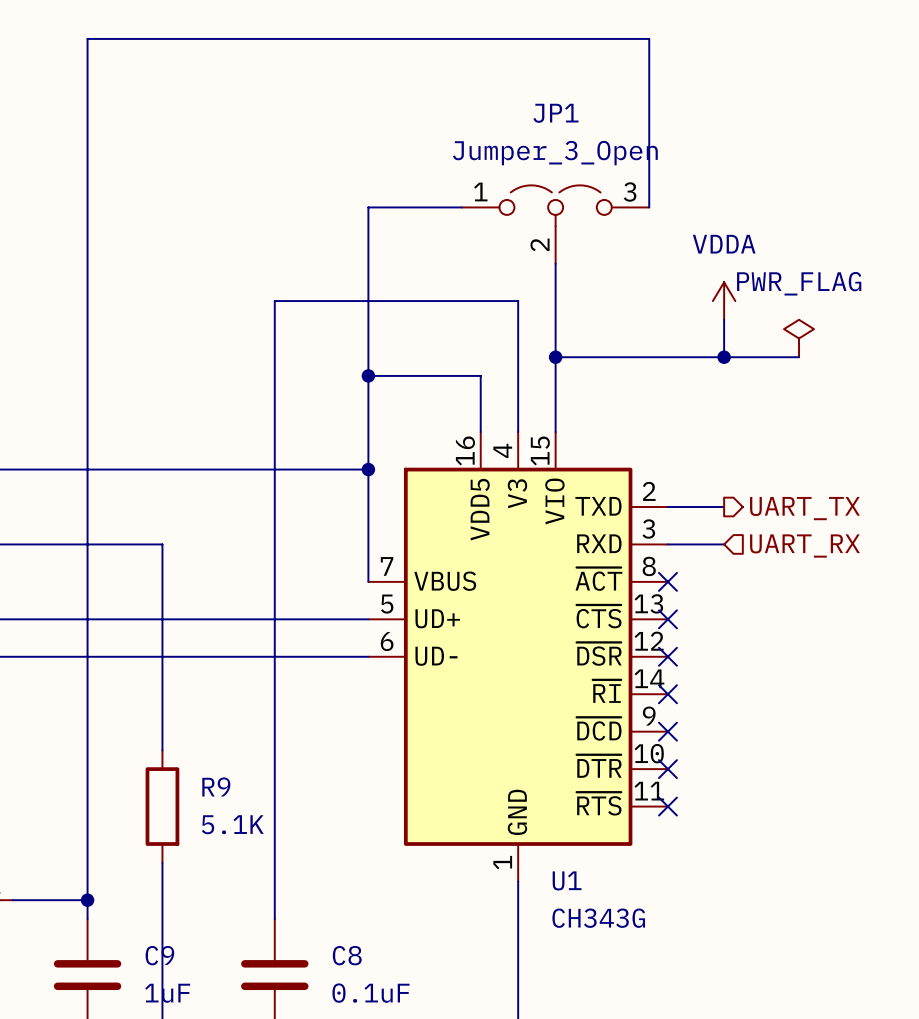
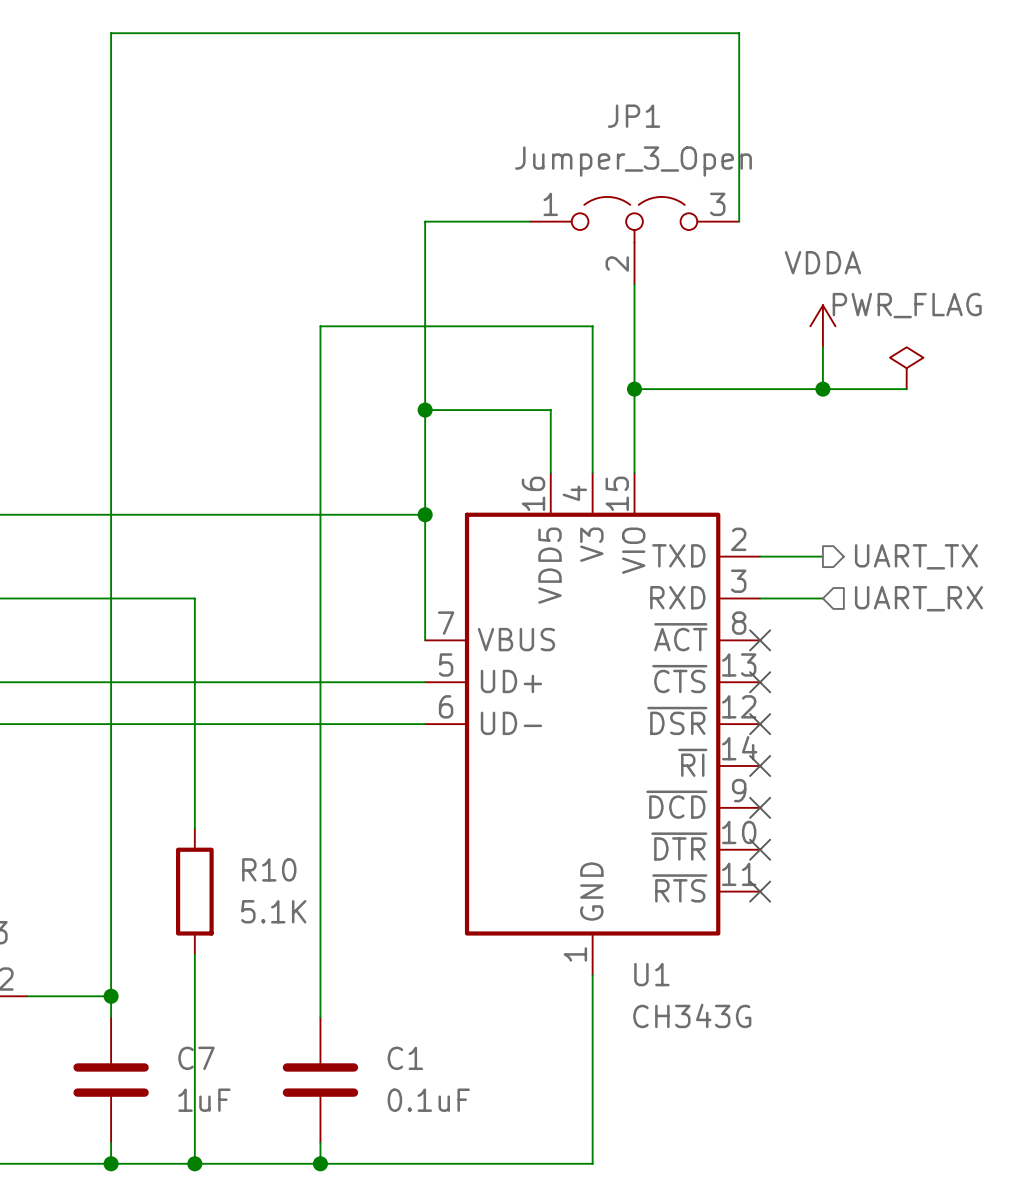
R9 name: R9 (216, 786) -> R10 (269, 869)
C9 name: C9 (159, 955) -> C7 (196, 1058)
C8 name: C8 (347, 955) -> C1 (405, 1058)

